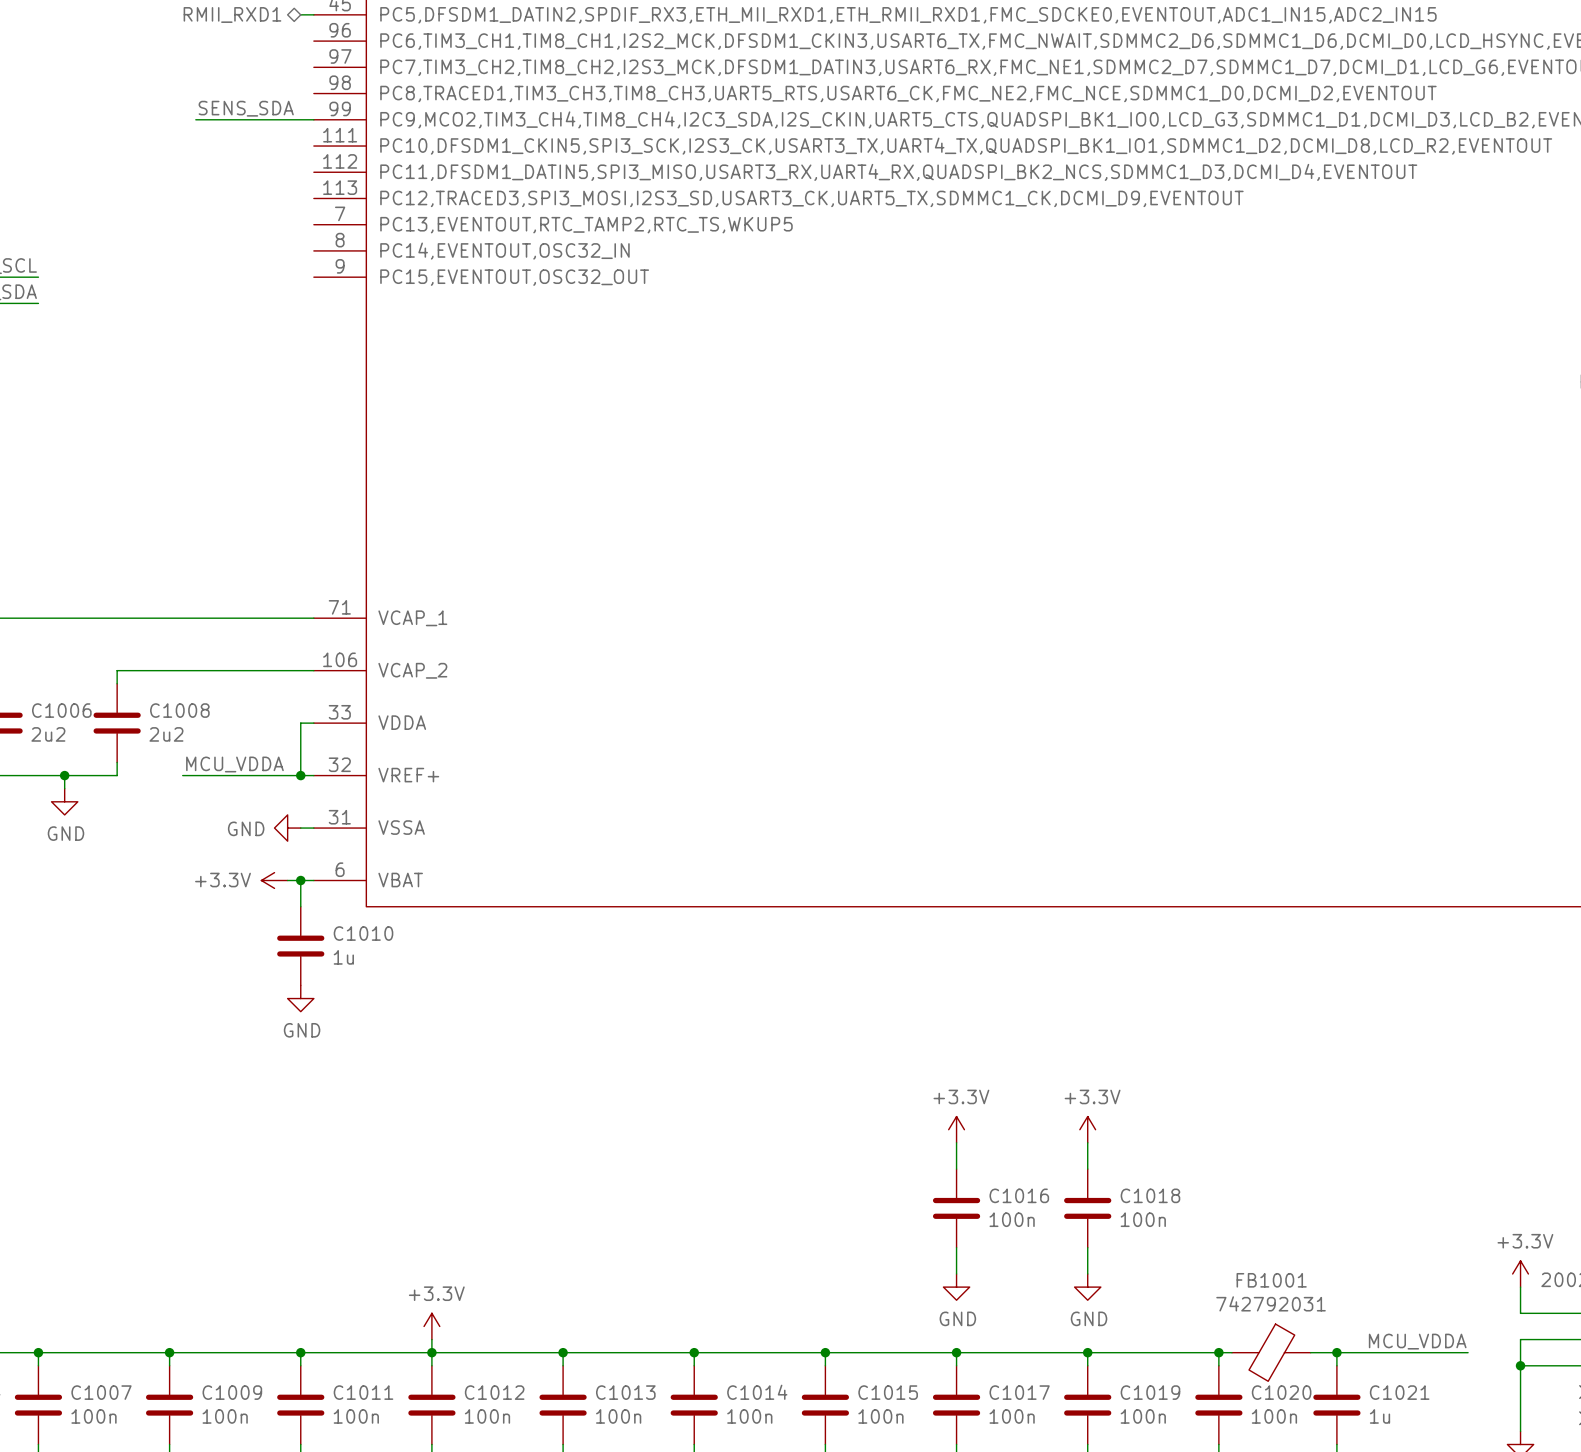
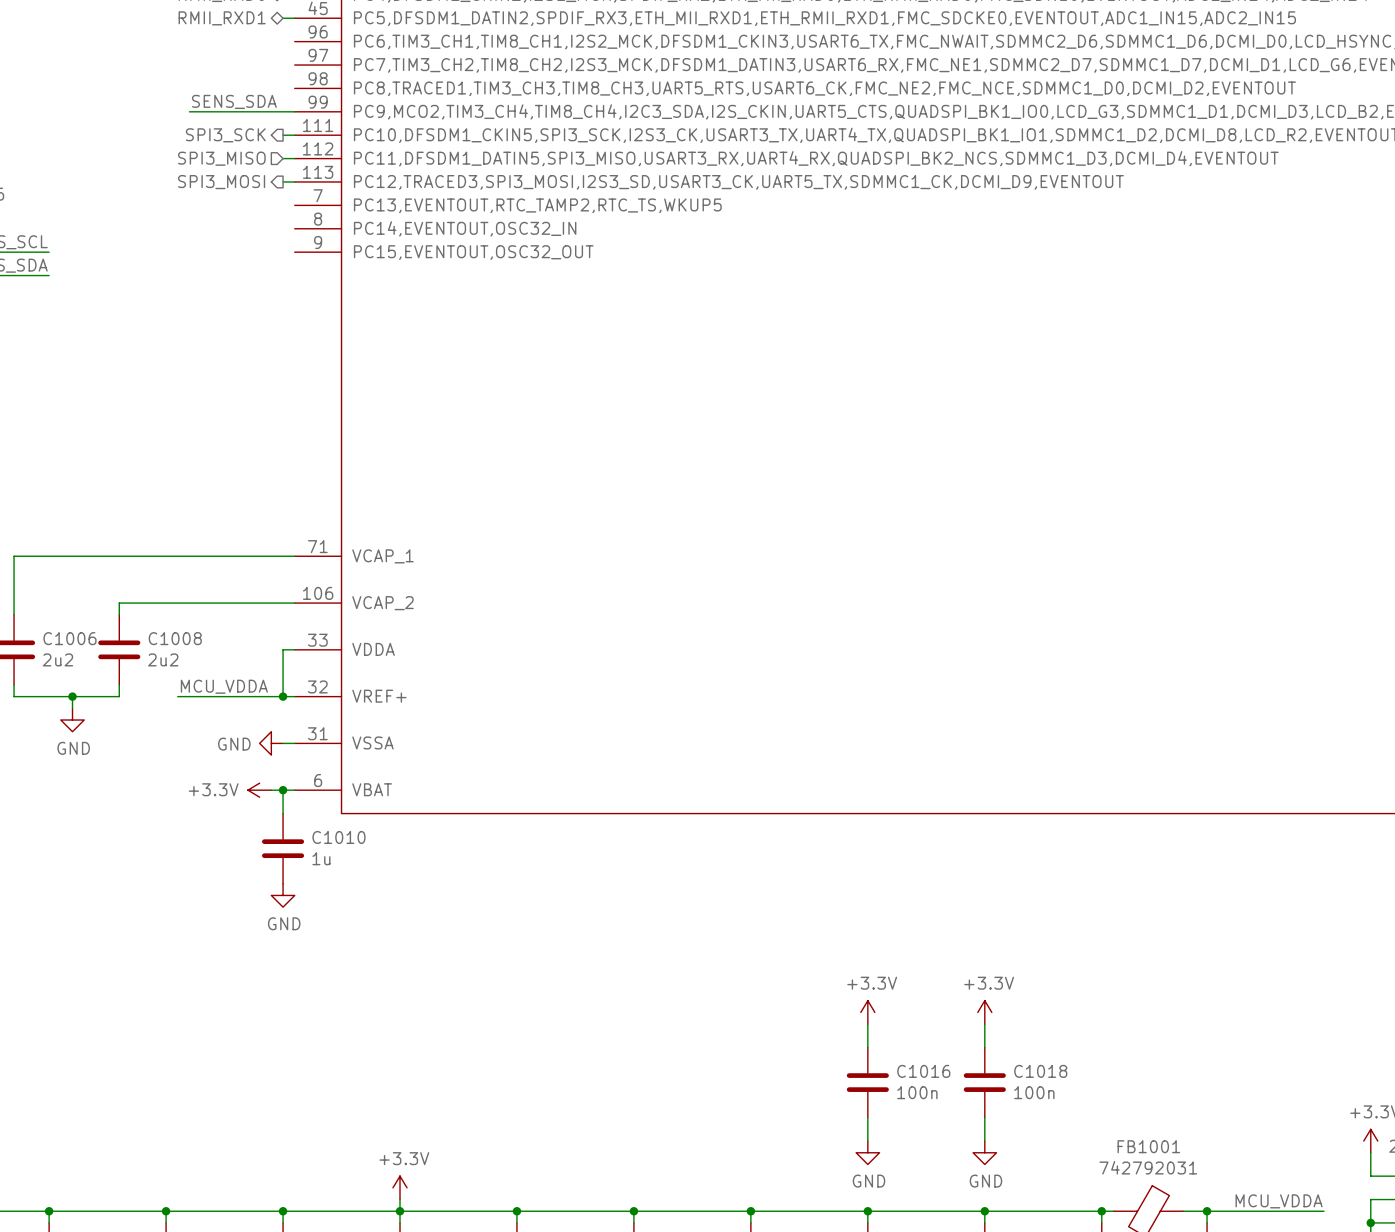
hierarchical label: none -> SPI3_SCK (225, 135)
wire: none -> (283, 135) (294, 135)
hierarchical label: none -> SPI3_MISO (221, 158)
wire: none -> (283, 158) (294, 158)
hierarchical label: none -> SPI3_MOSI (221, 182)
wire: none -> (283, 181) (294, 181)

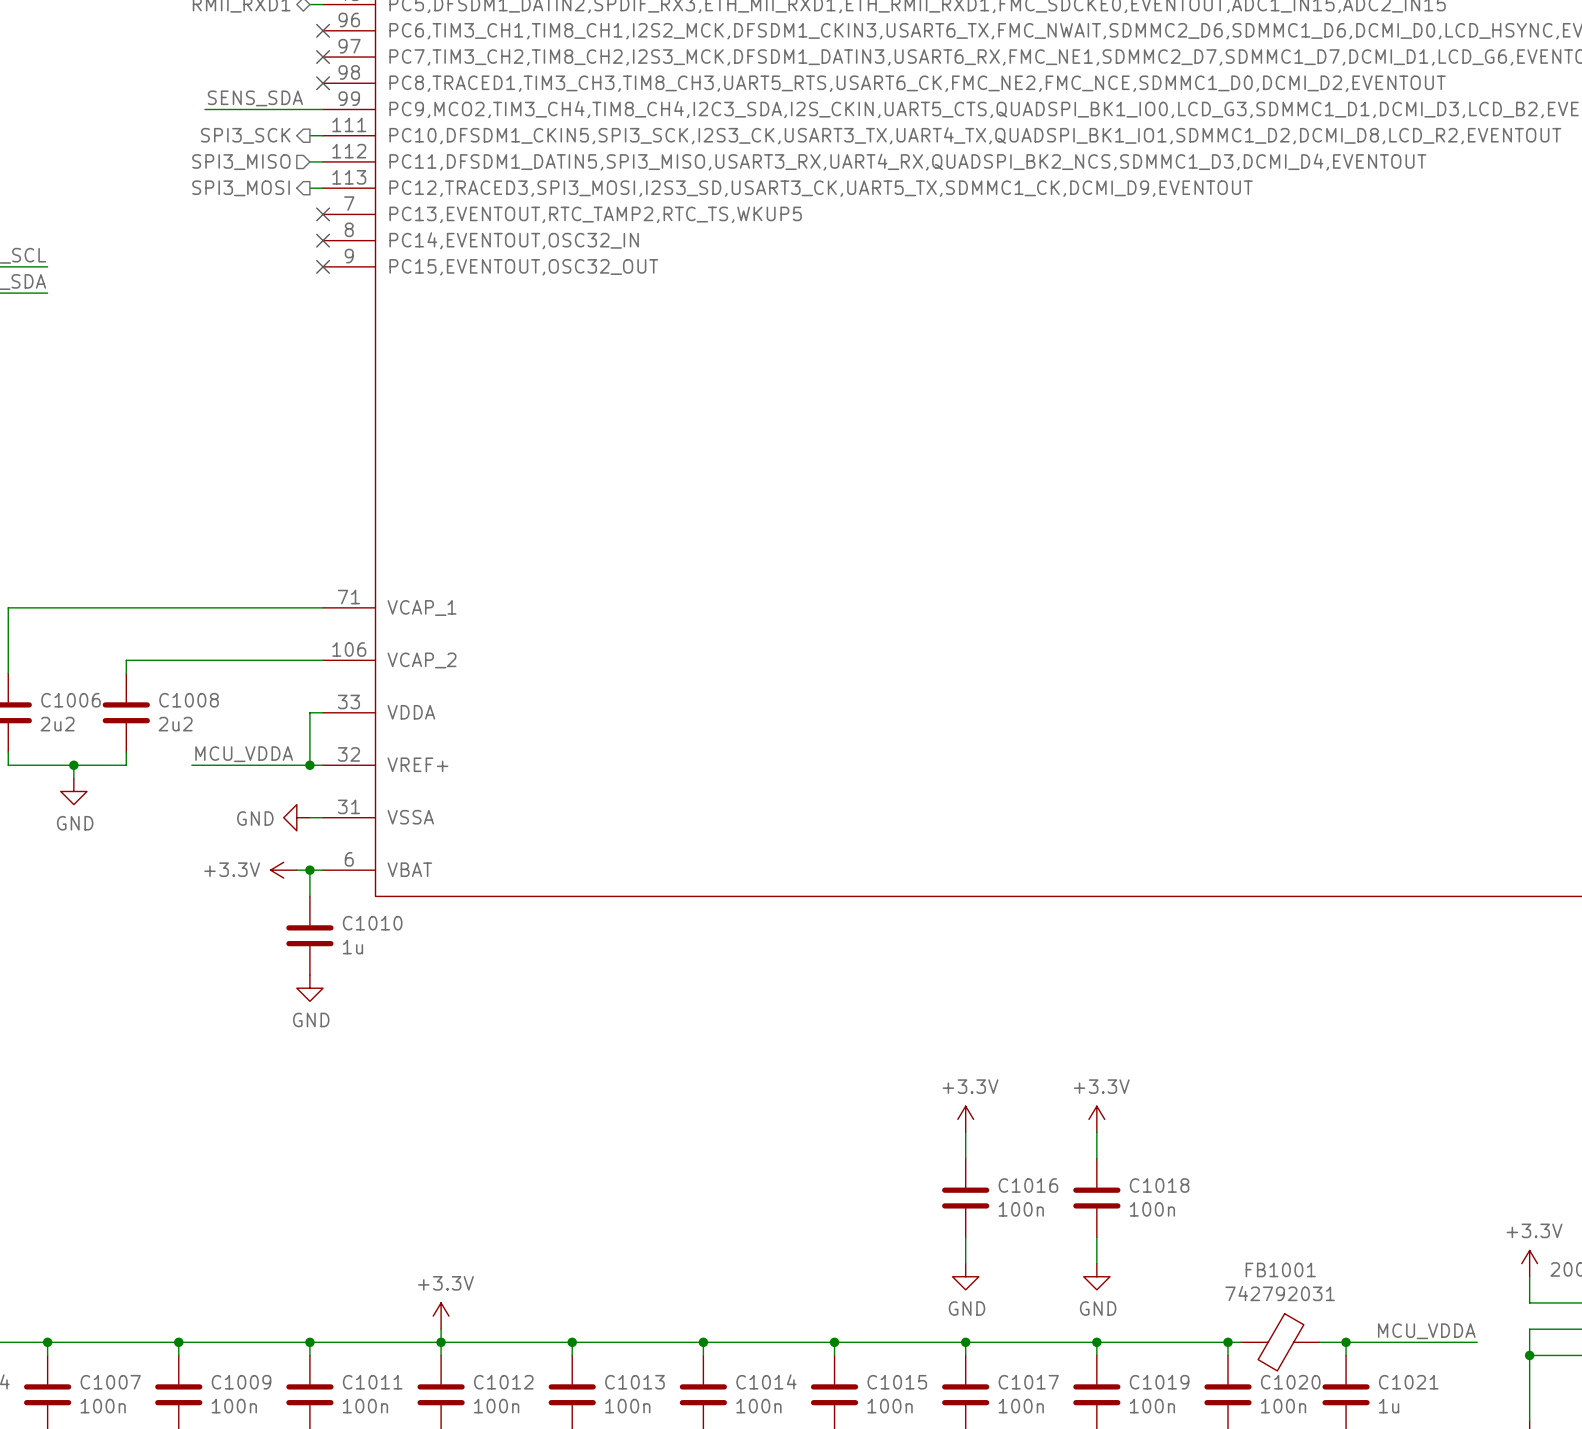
no-connect mark: none -> (323, 30)
no-connect mark: none -> (323, 57)
no-connect mark: none -> (323, 83)
no-connect mark: none -> (323, 214)
no-connect mark: none -> (323, 240)
no-connect mark: none -> (323, 266)

